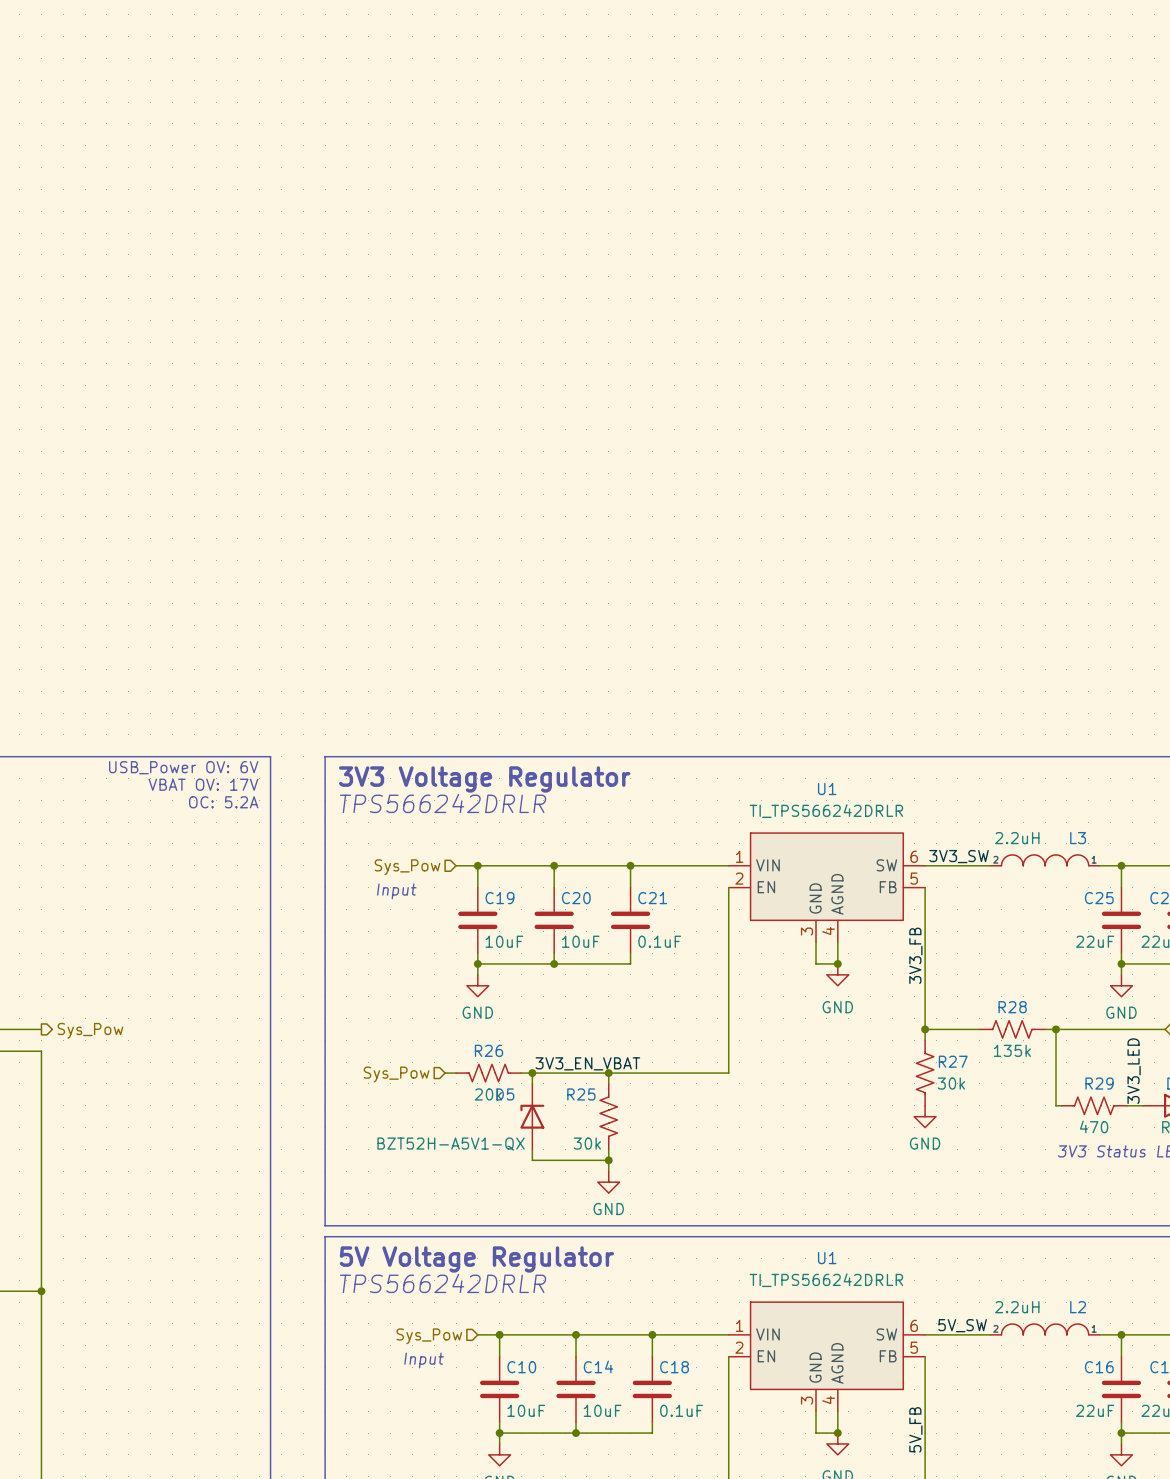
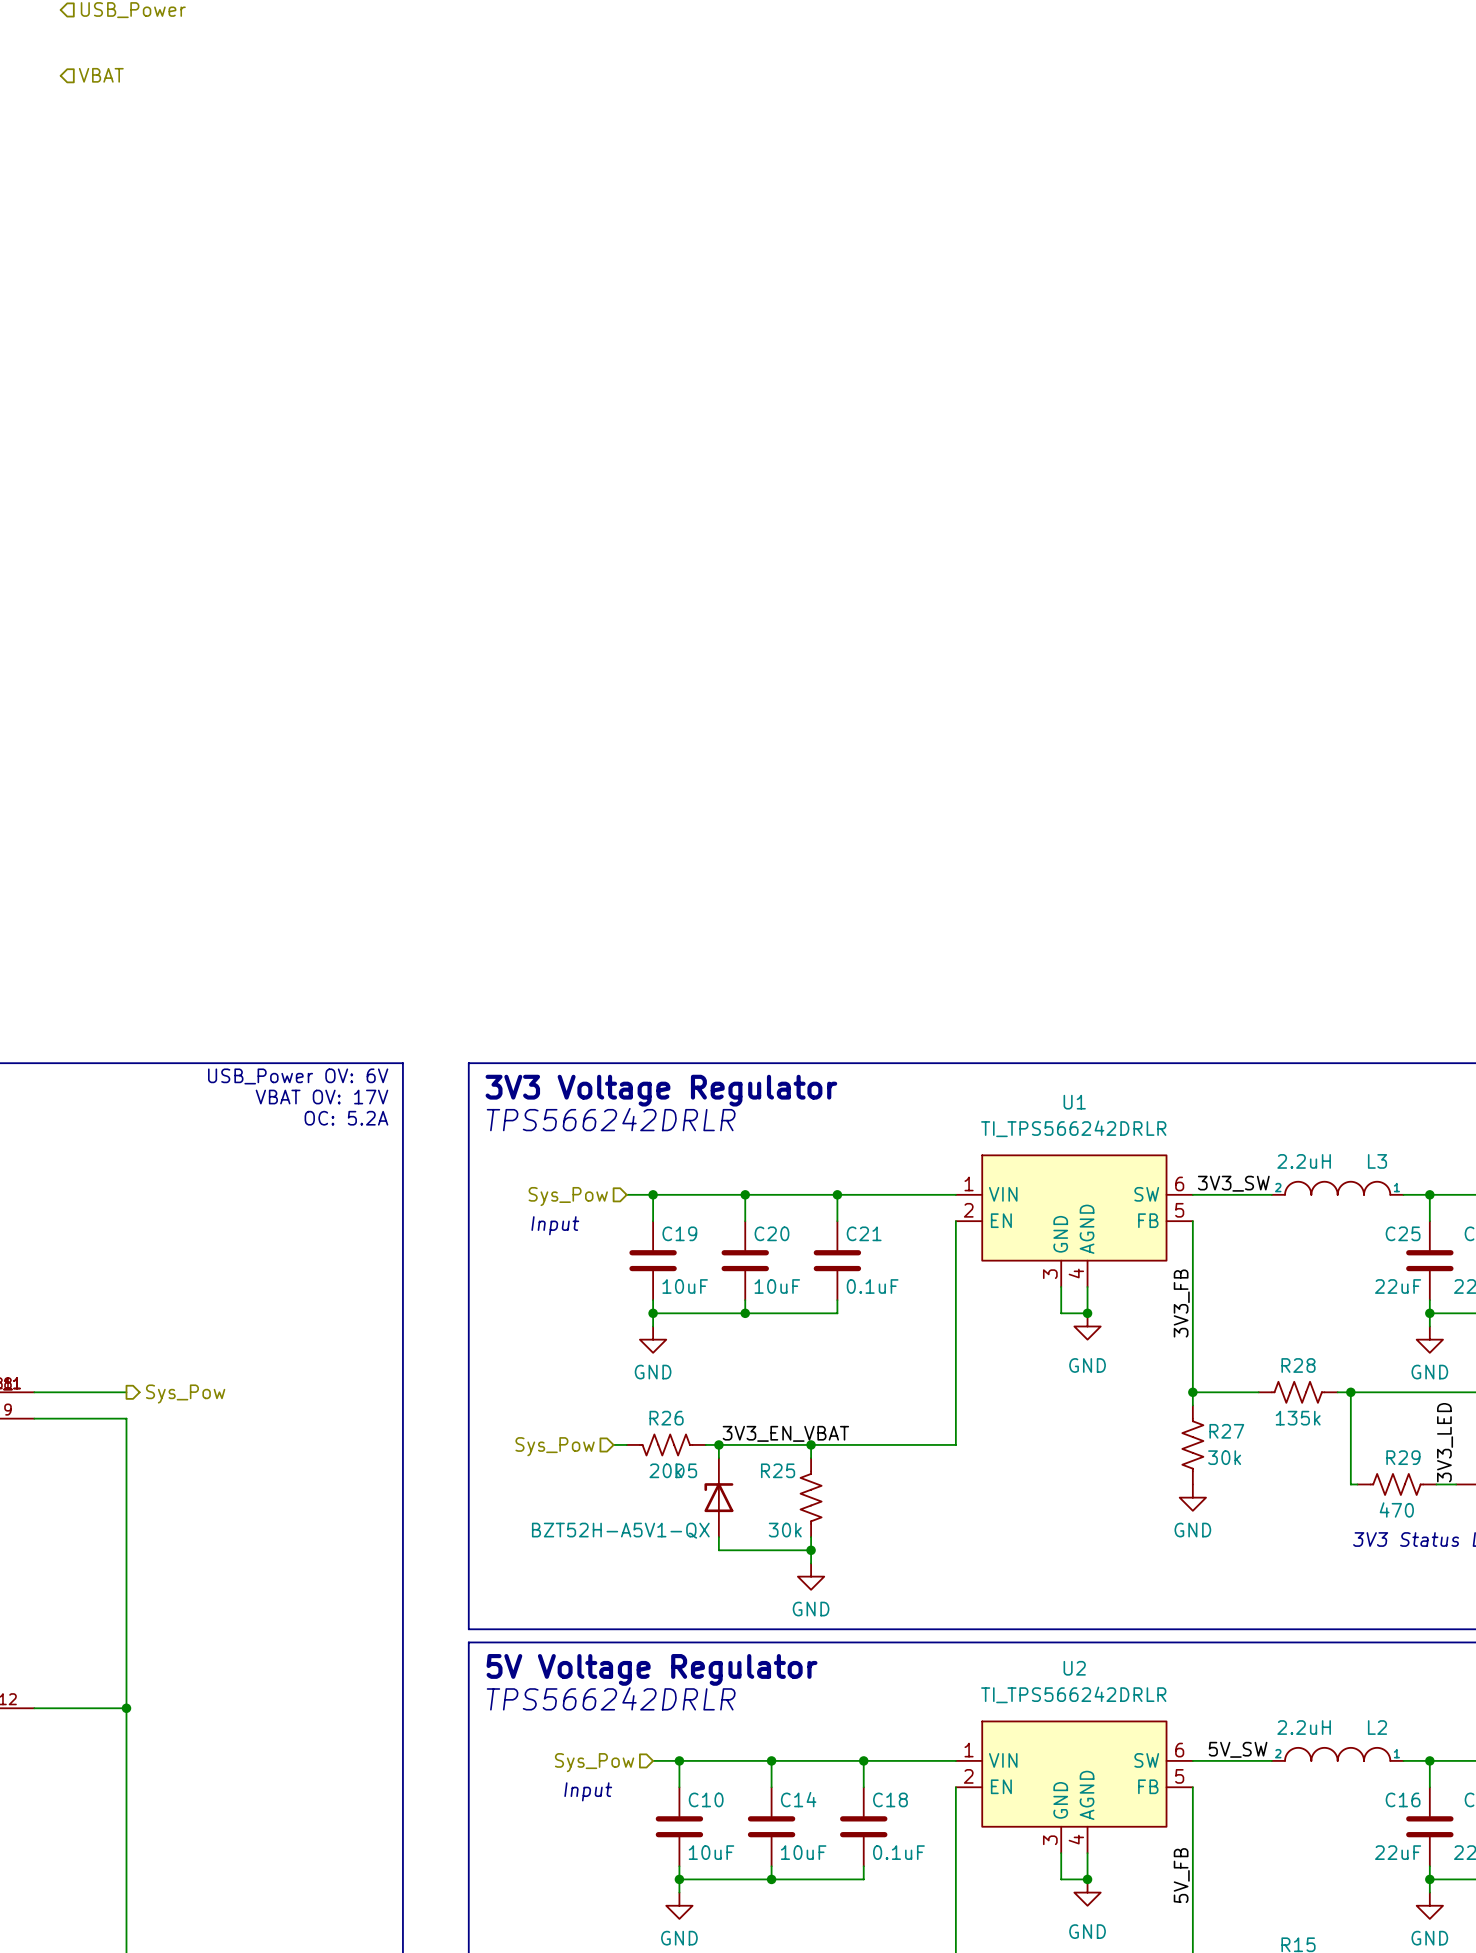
U1 name: U1 (827, 1258) -> U2 (1074, 1668)

